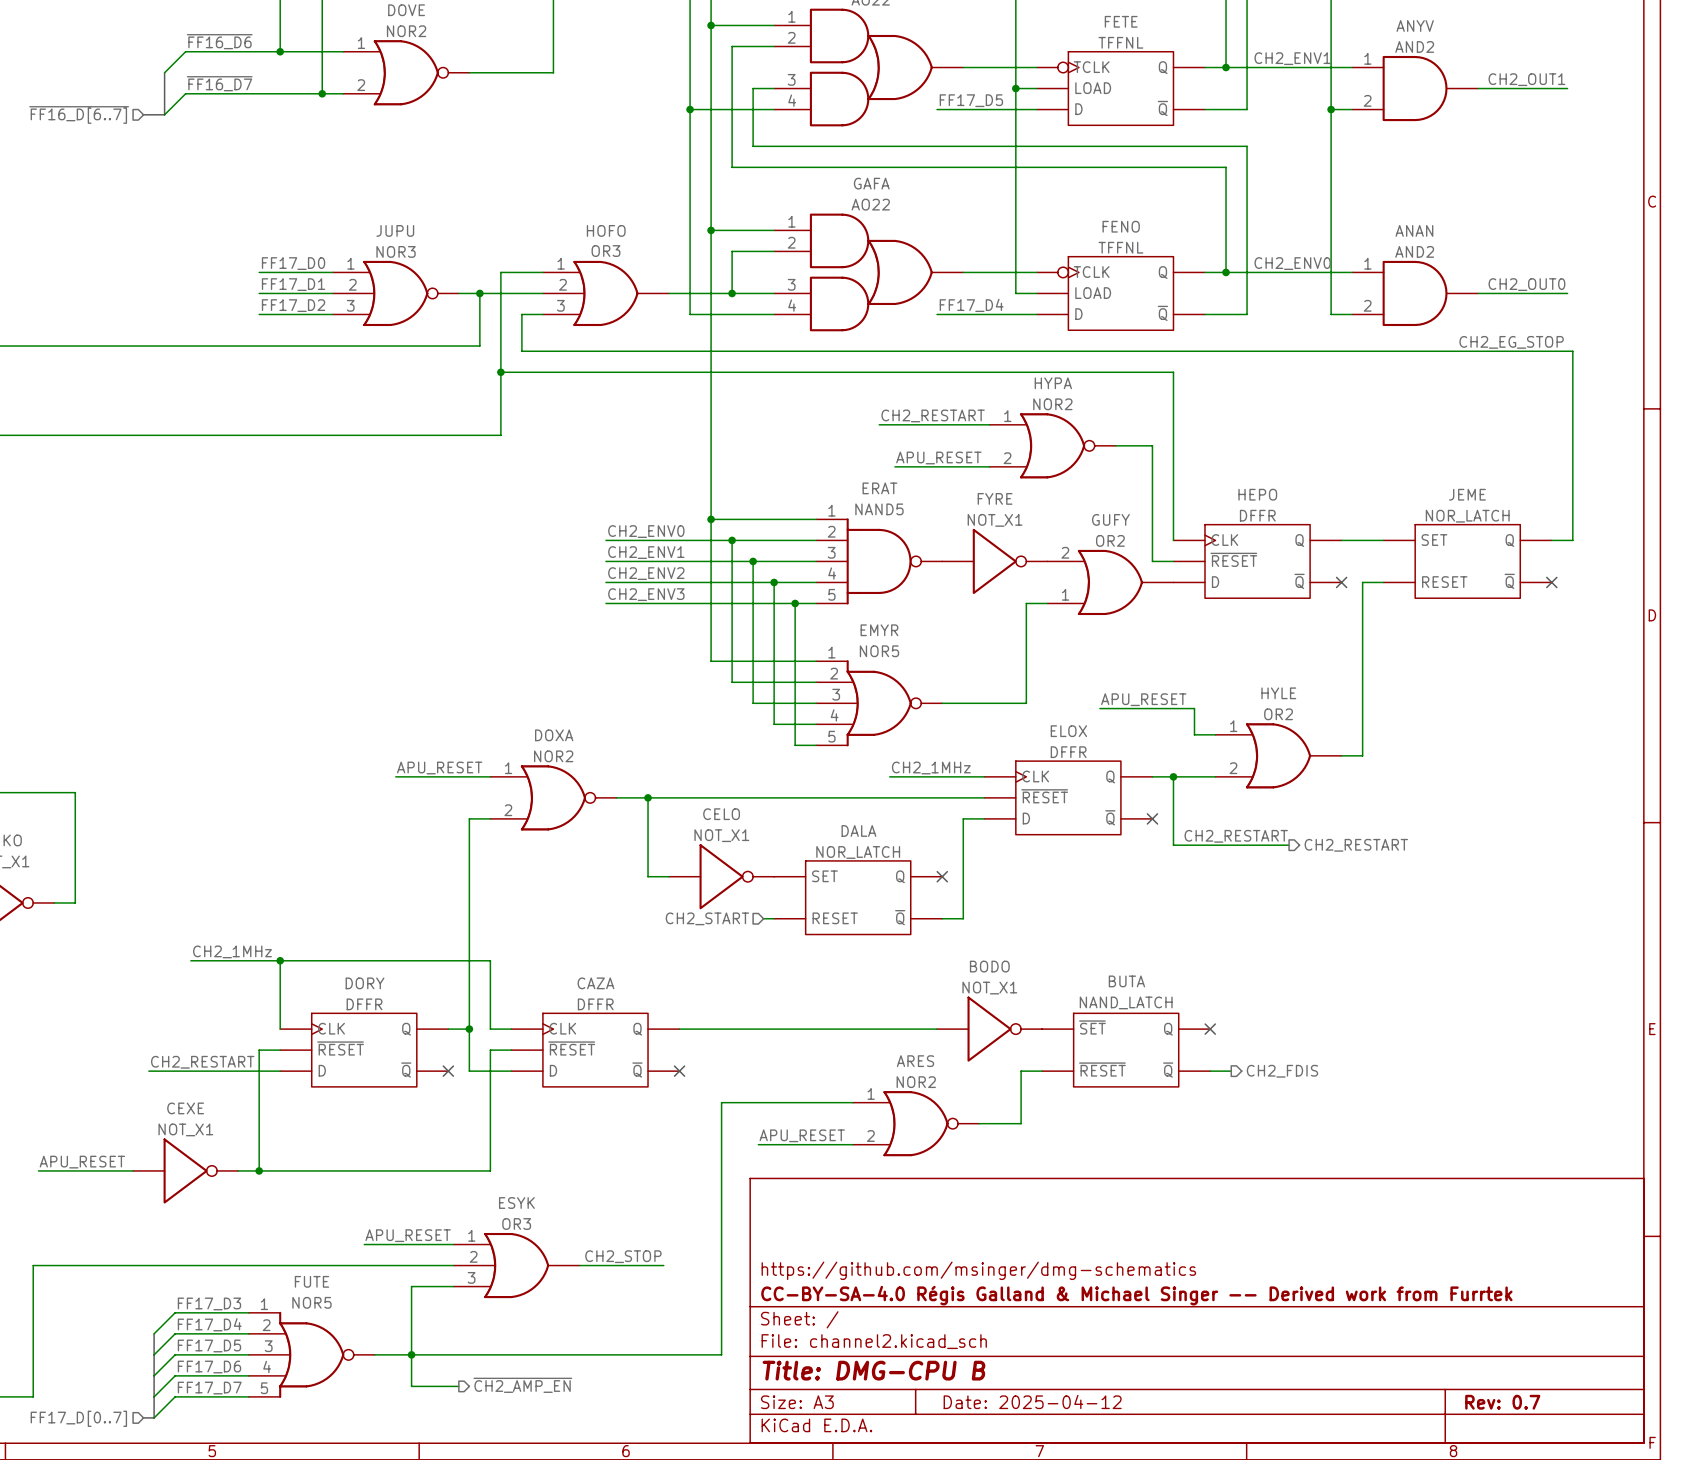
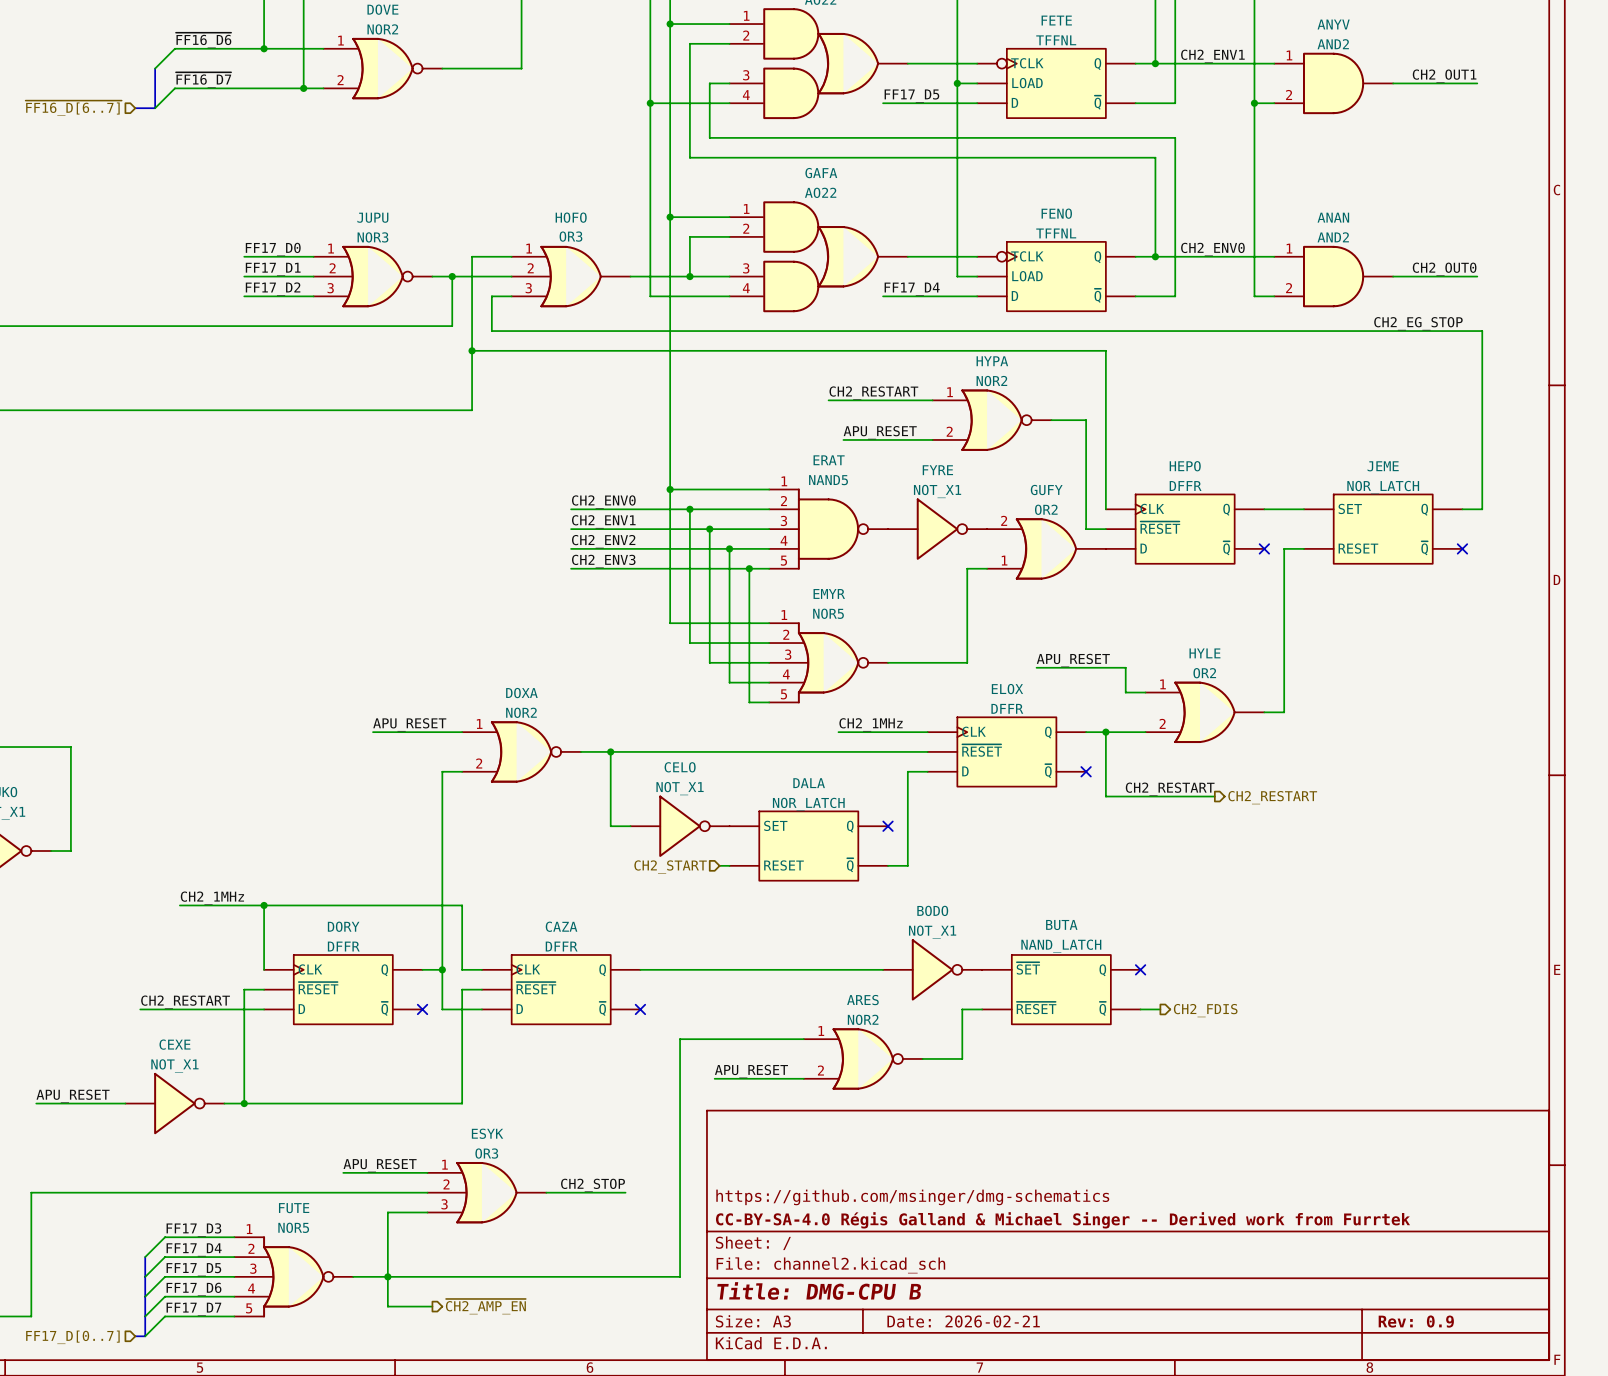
title block: Date: 2025-04-12 (1032, 1401) -> Date: 2026-02-21 (963, 1321)
title block: Rev: 0.7 (1502, 1402) -> Rev: 0.9 (1416, 1321)

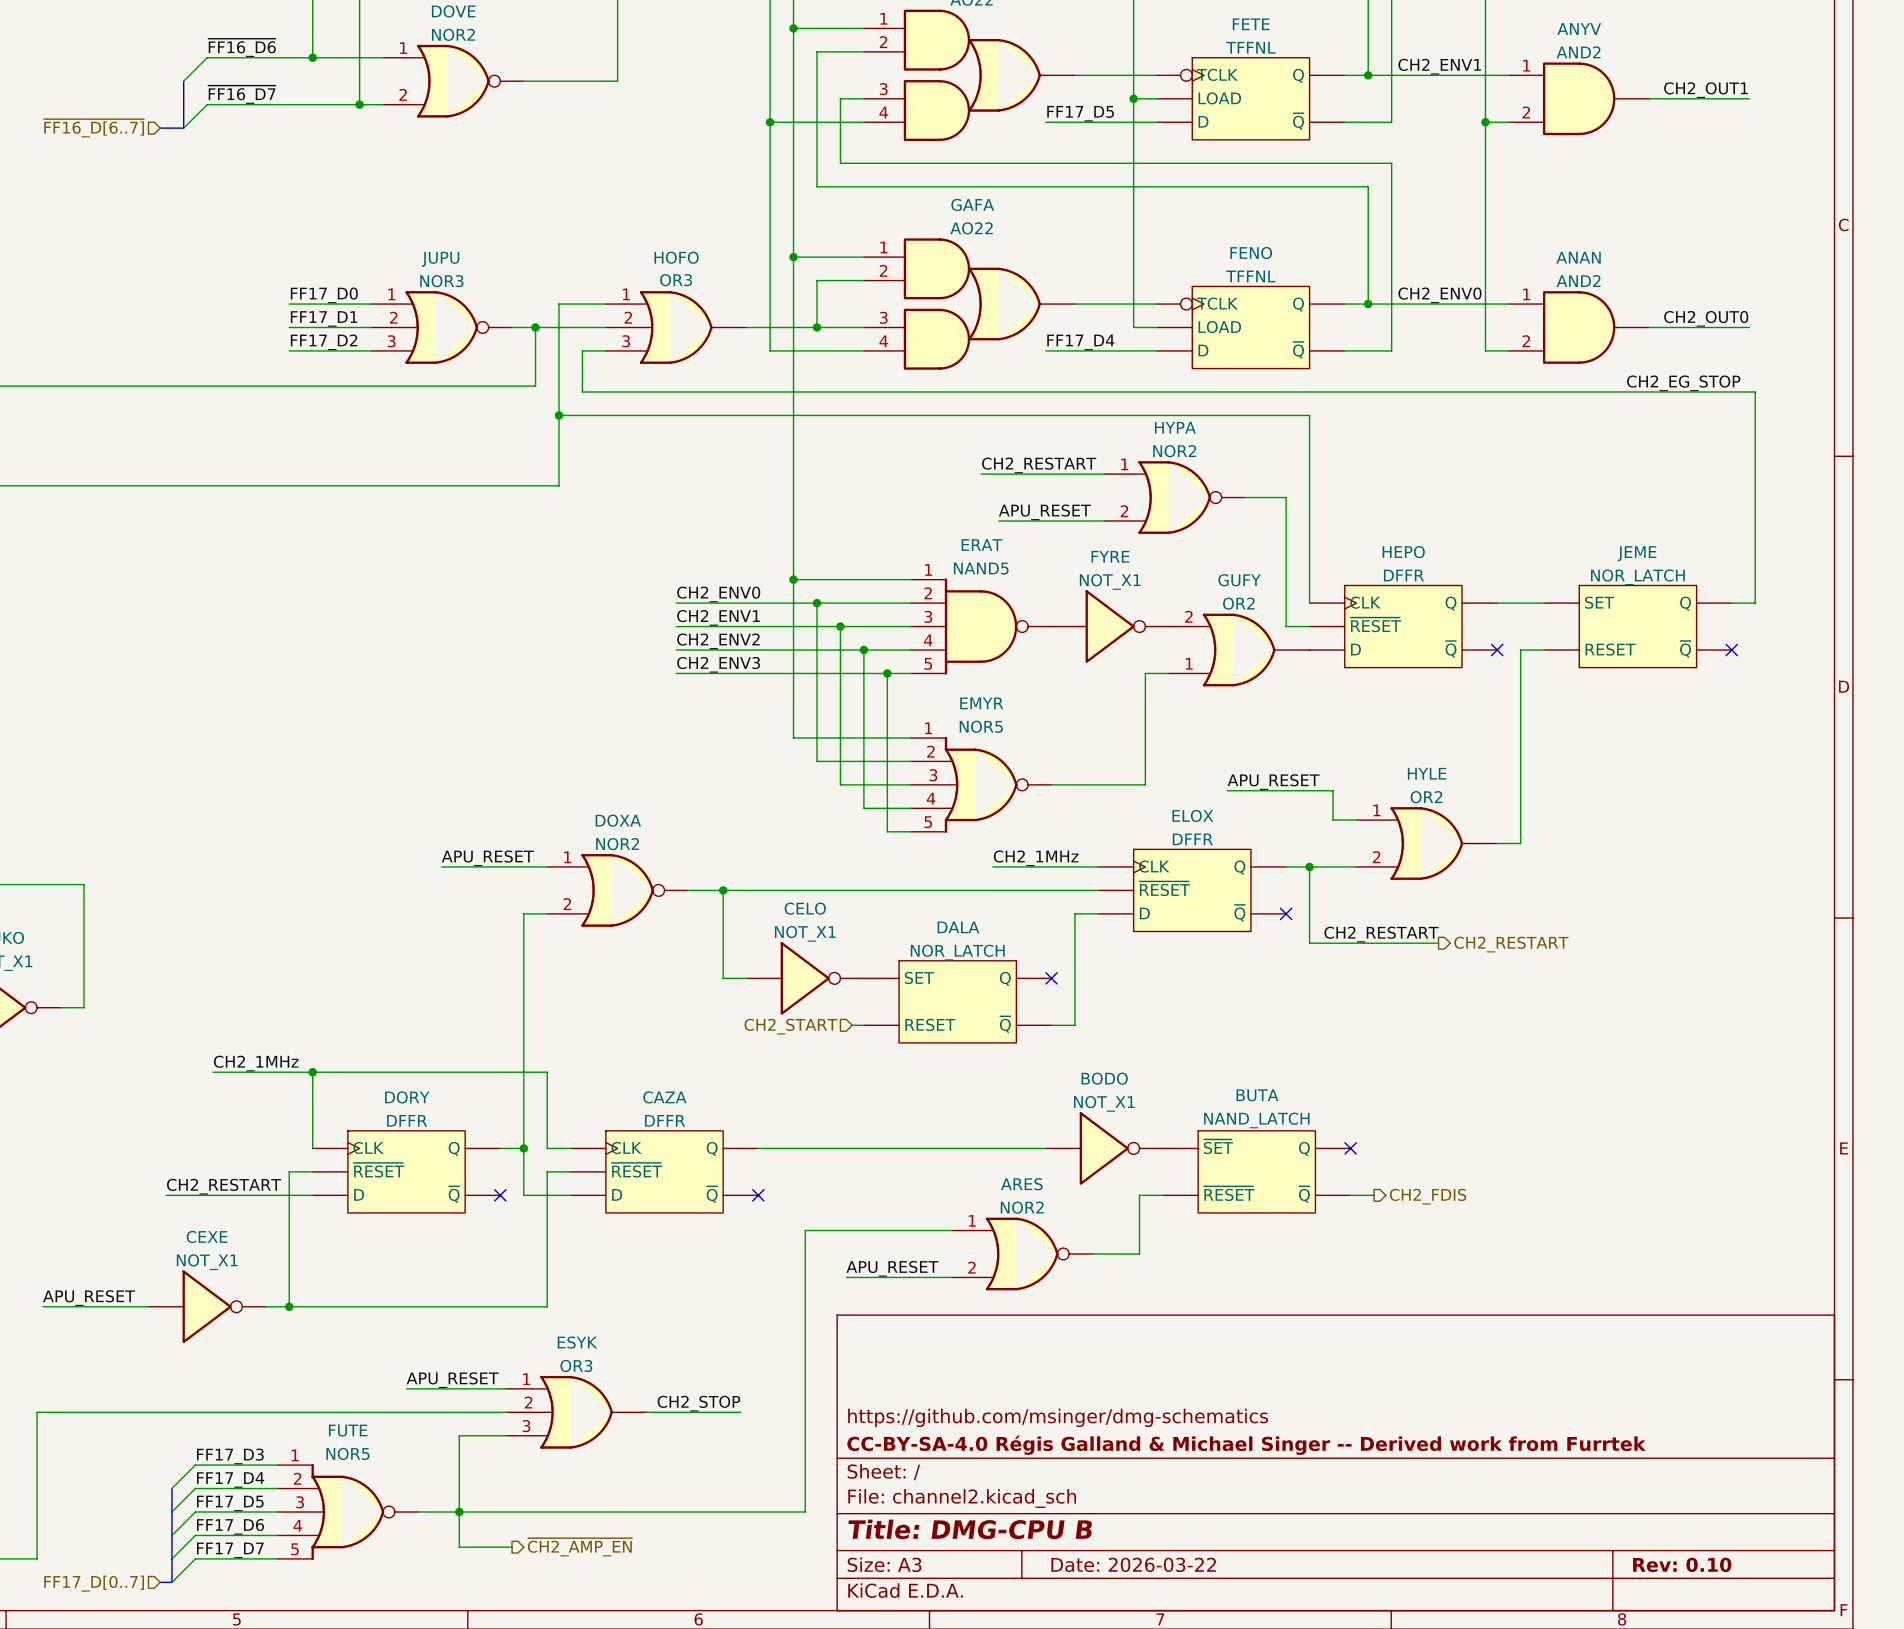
title block: Date: 2026-02-21 (963, 1321) -> Date: 2026-03-22 (1133, 1564)
title block: Rev: 0.9 (1416, 1321) -> Rev: 0.10 (1682, 1564)

